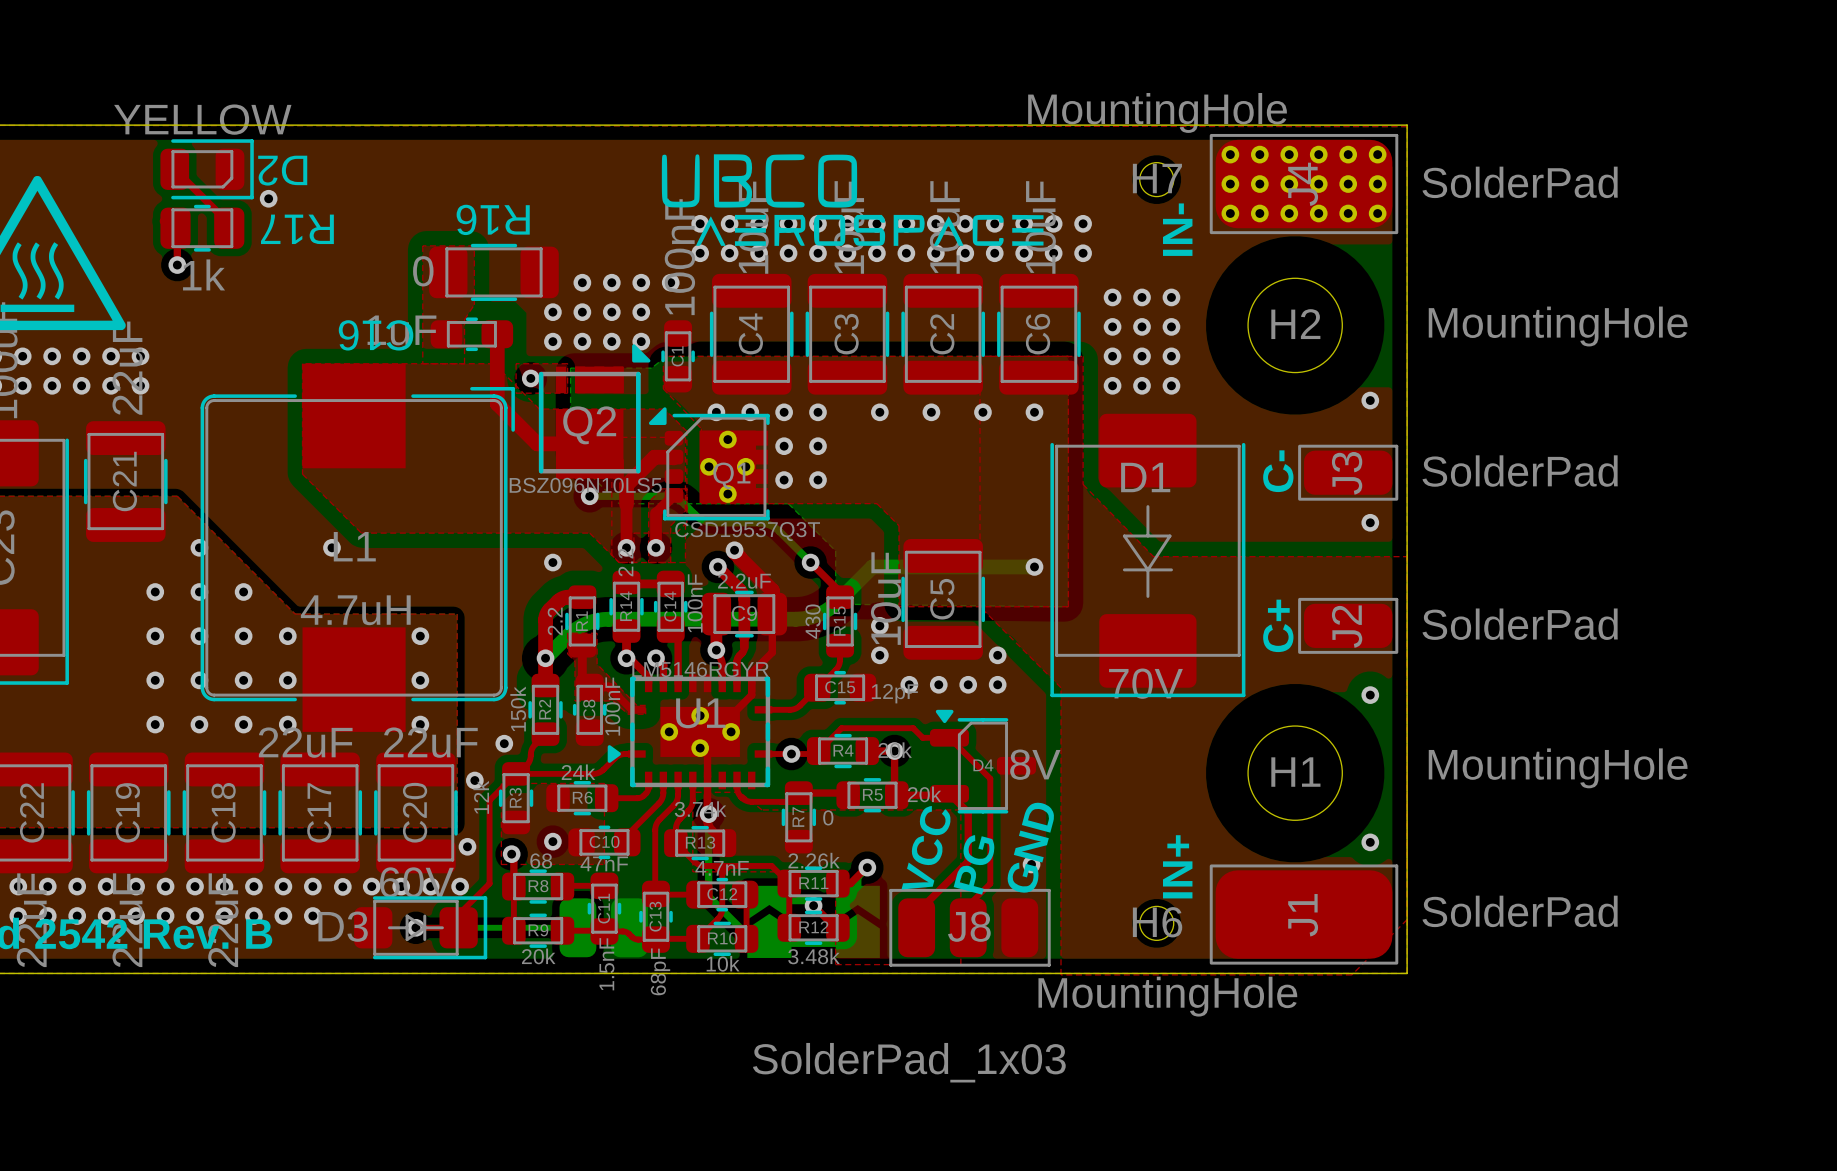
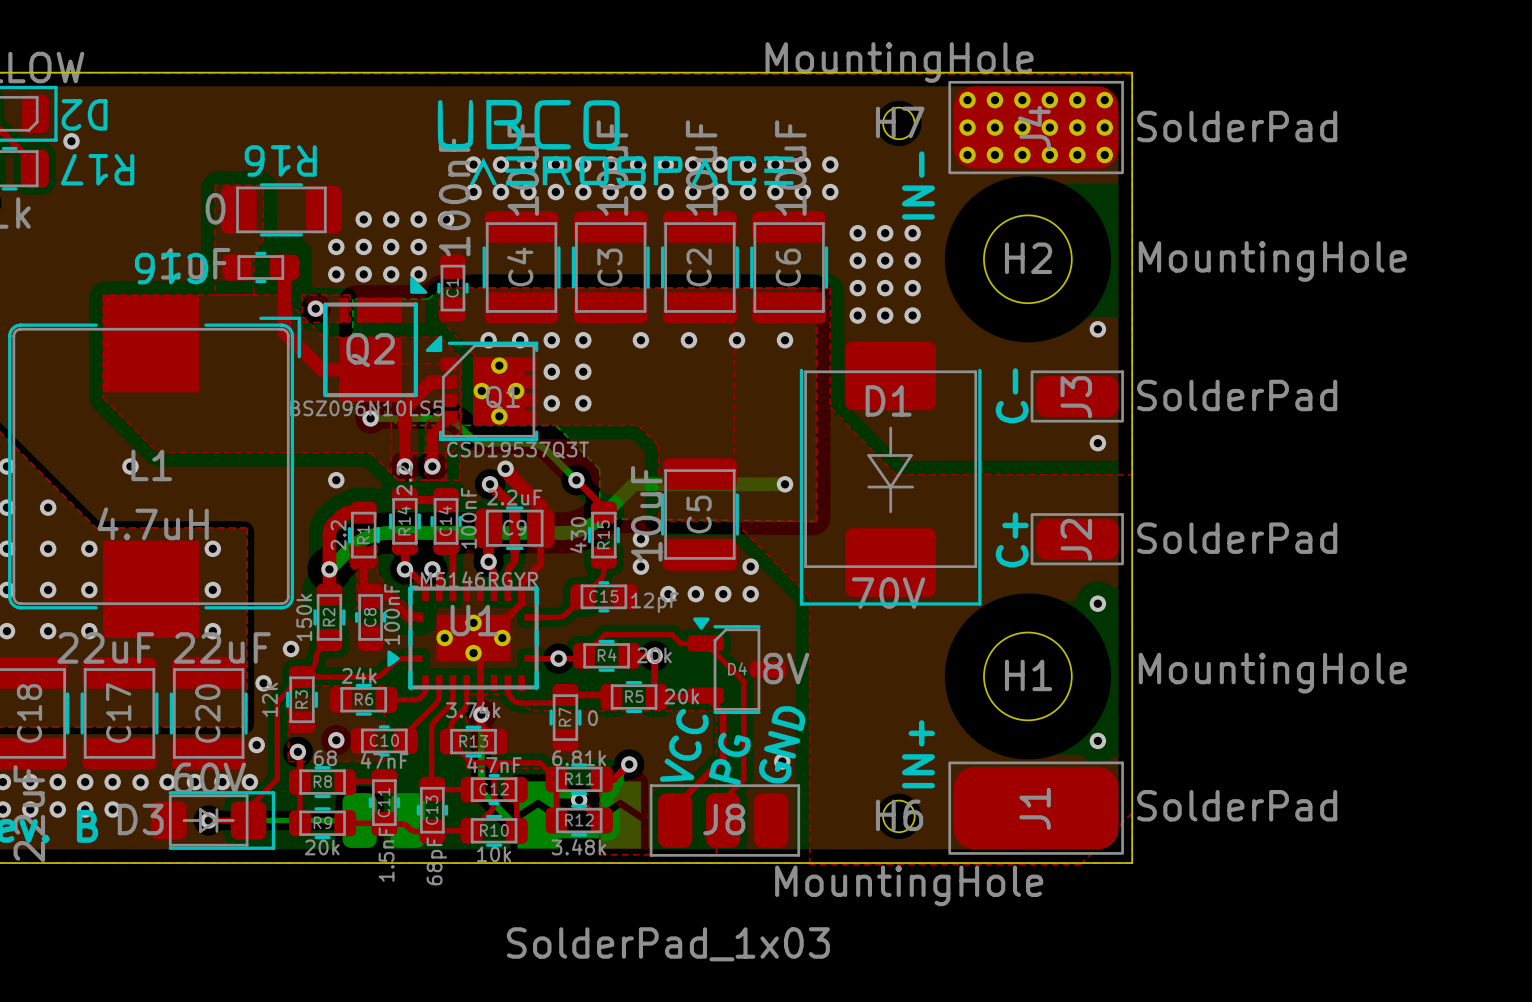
R11 value: 2.26k (814, 860) -> 6.81k (579, 758)

